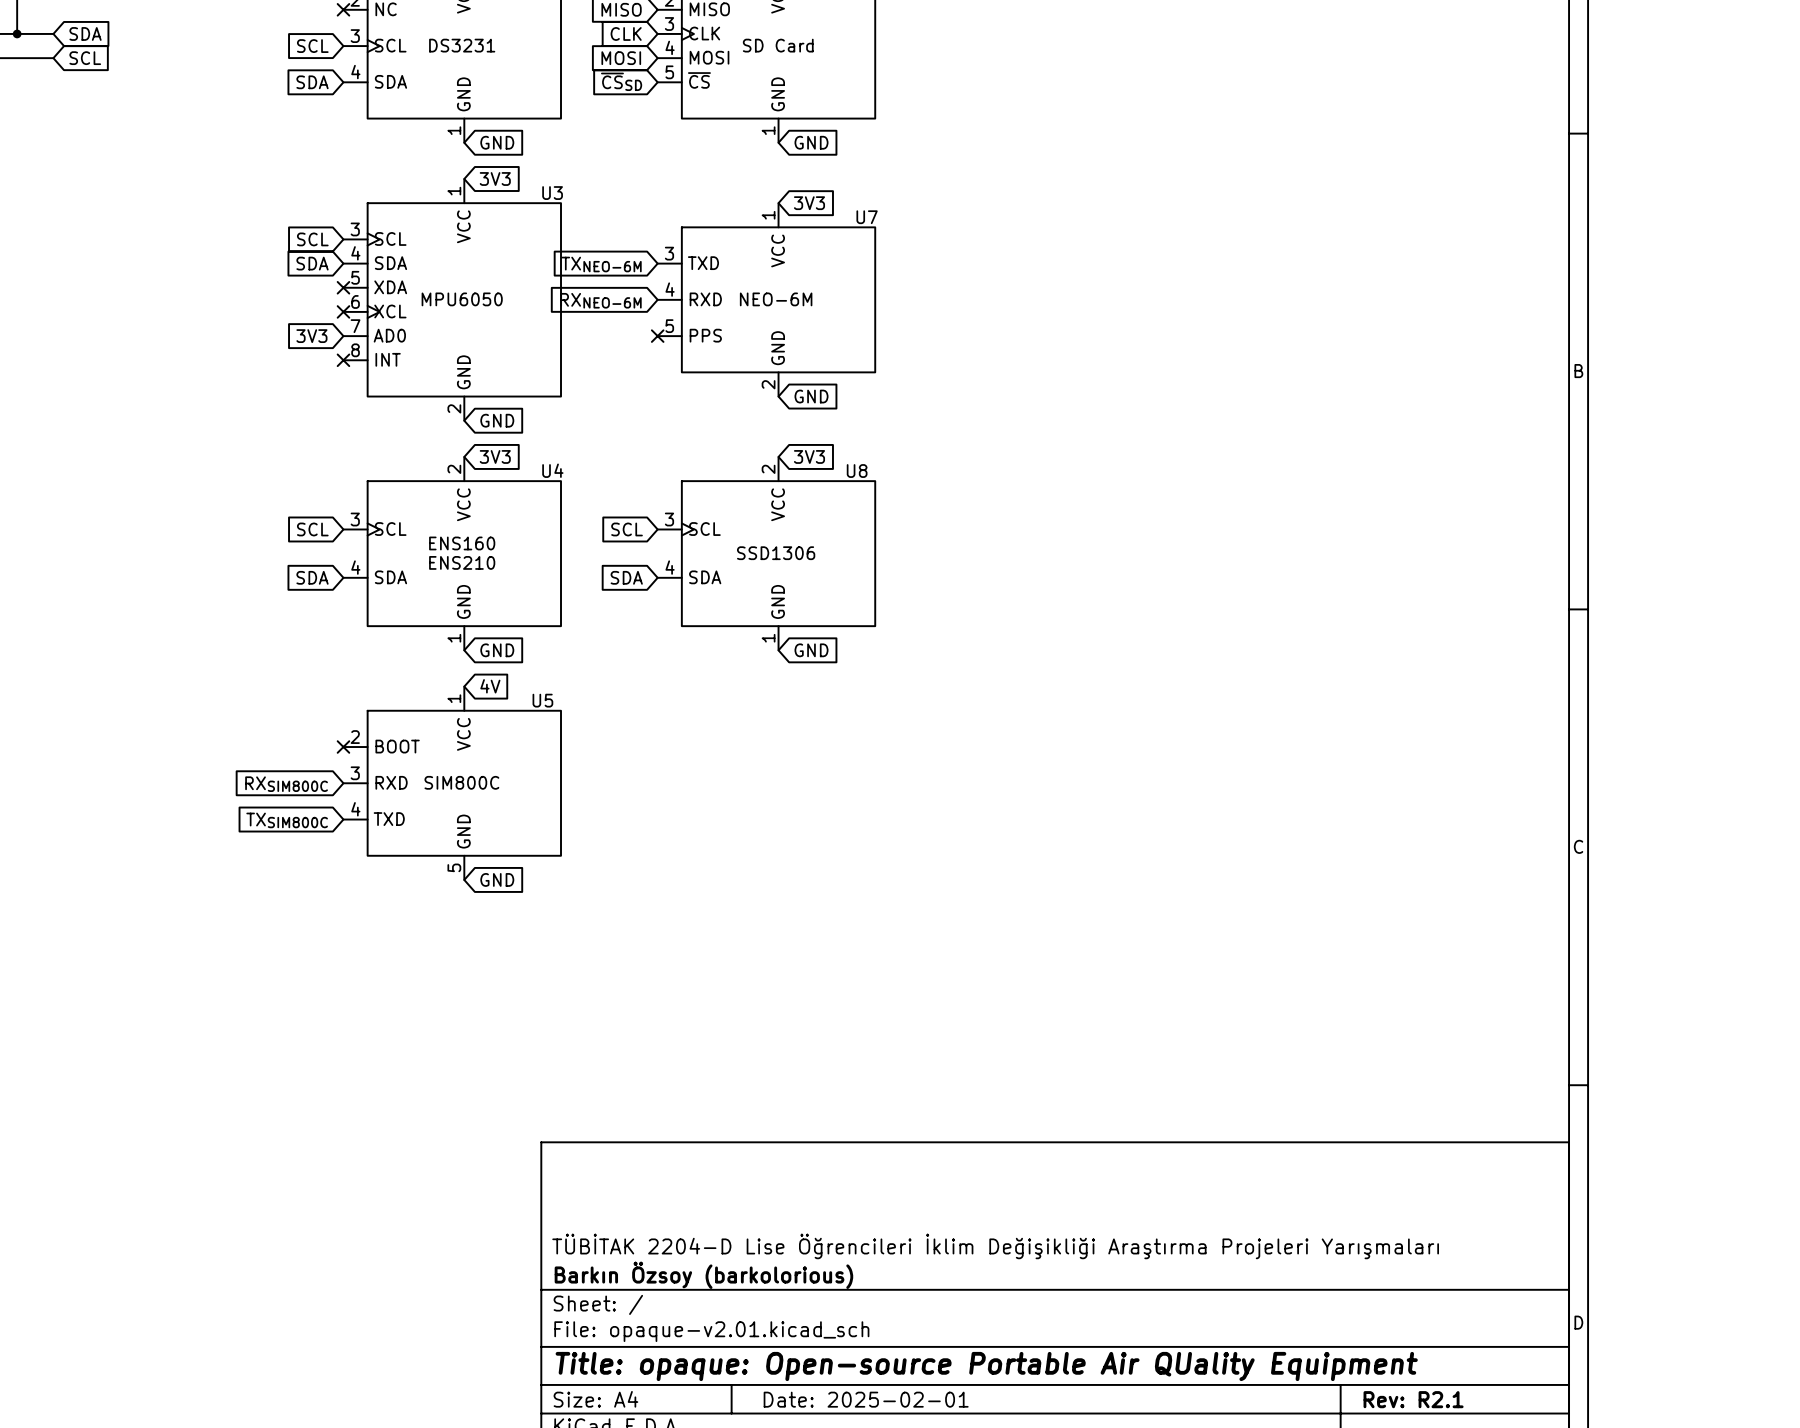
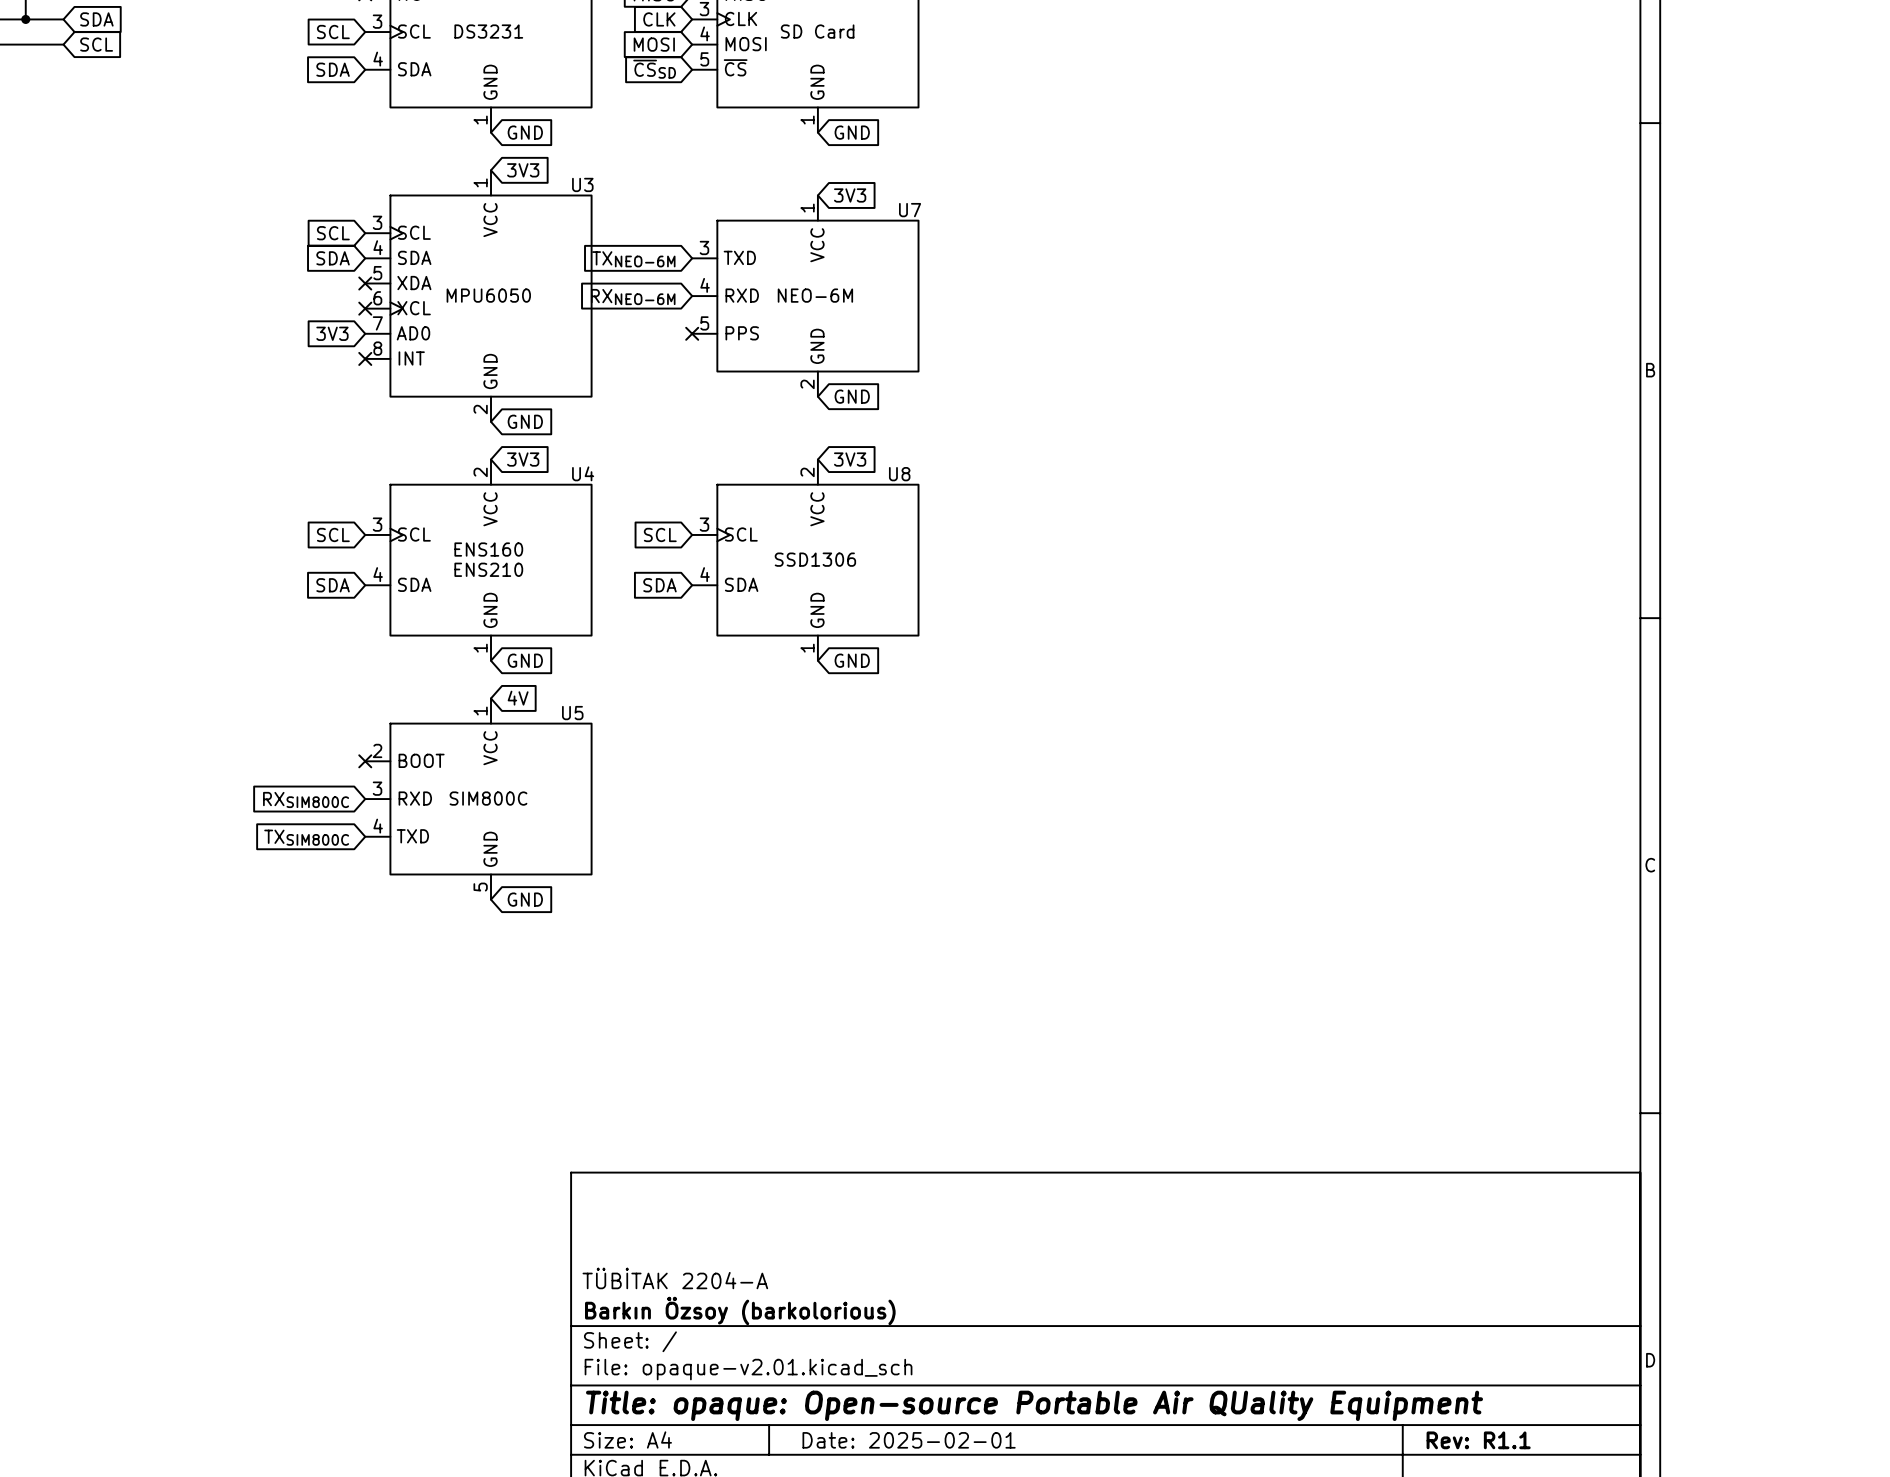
title block: TÜBİTAK 2204-D Lise Öğrencileri İklim Değişikliği Araştırma Projeleri Yarışmaları (995, 1246) -> TÜBİTAK 2204-A (675, 1278)
title block: Rev: R2.1 (1413, 1399) -> Rev: R1.1 (1478, 1440)

